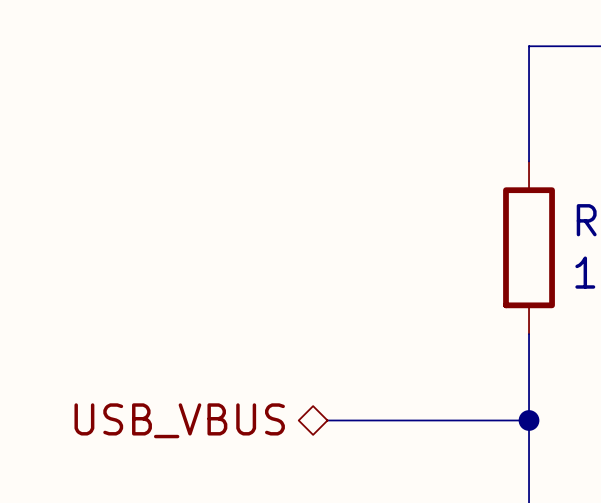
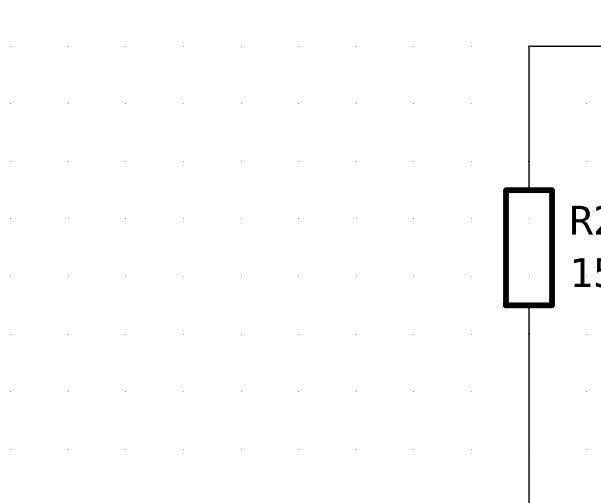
hierarchical label: USB_VBUS (179, 420) -> none
wire: (327, 420) (529, 420) -> none
junction: (529, 420) -> none

